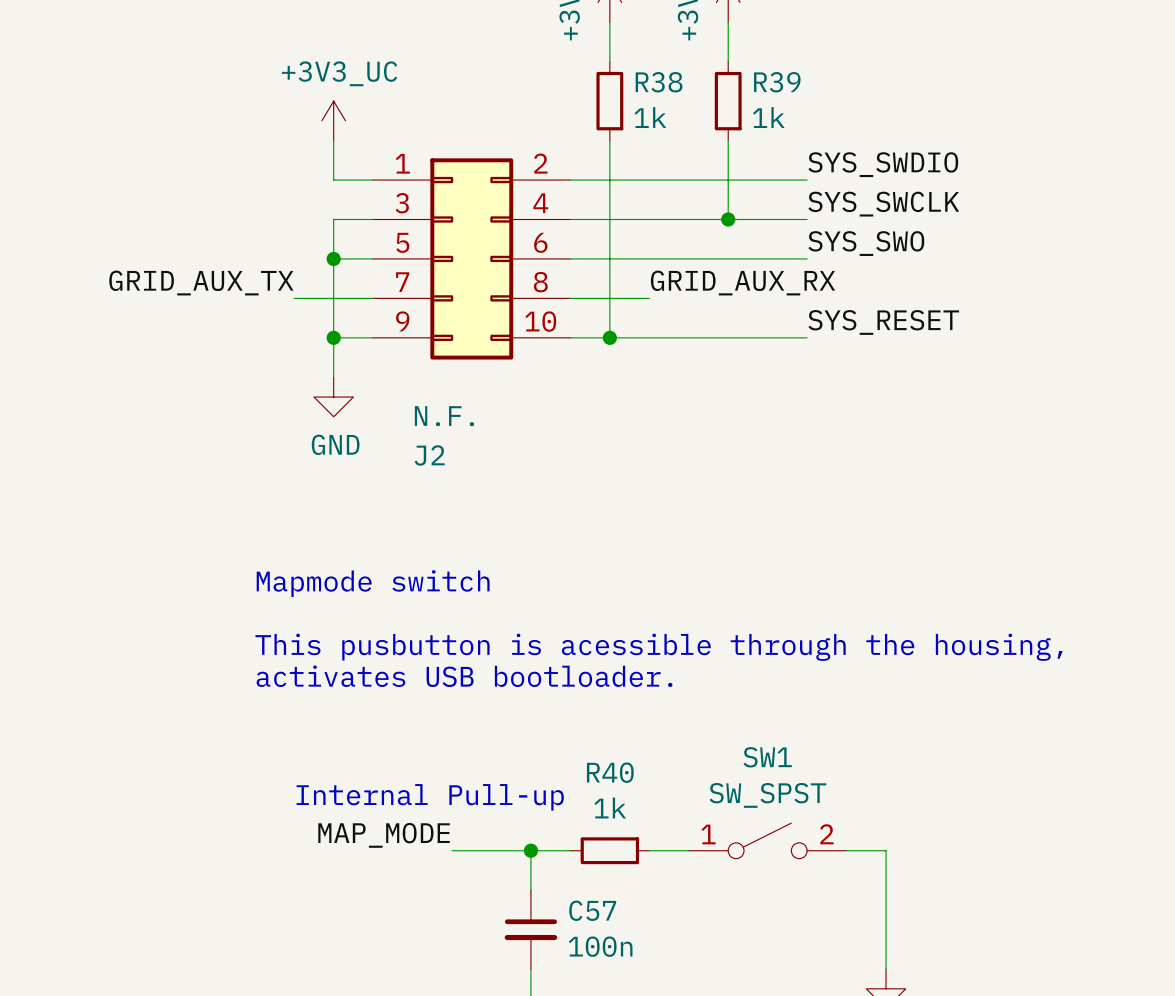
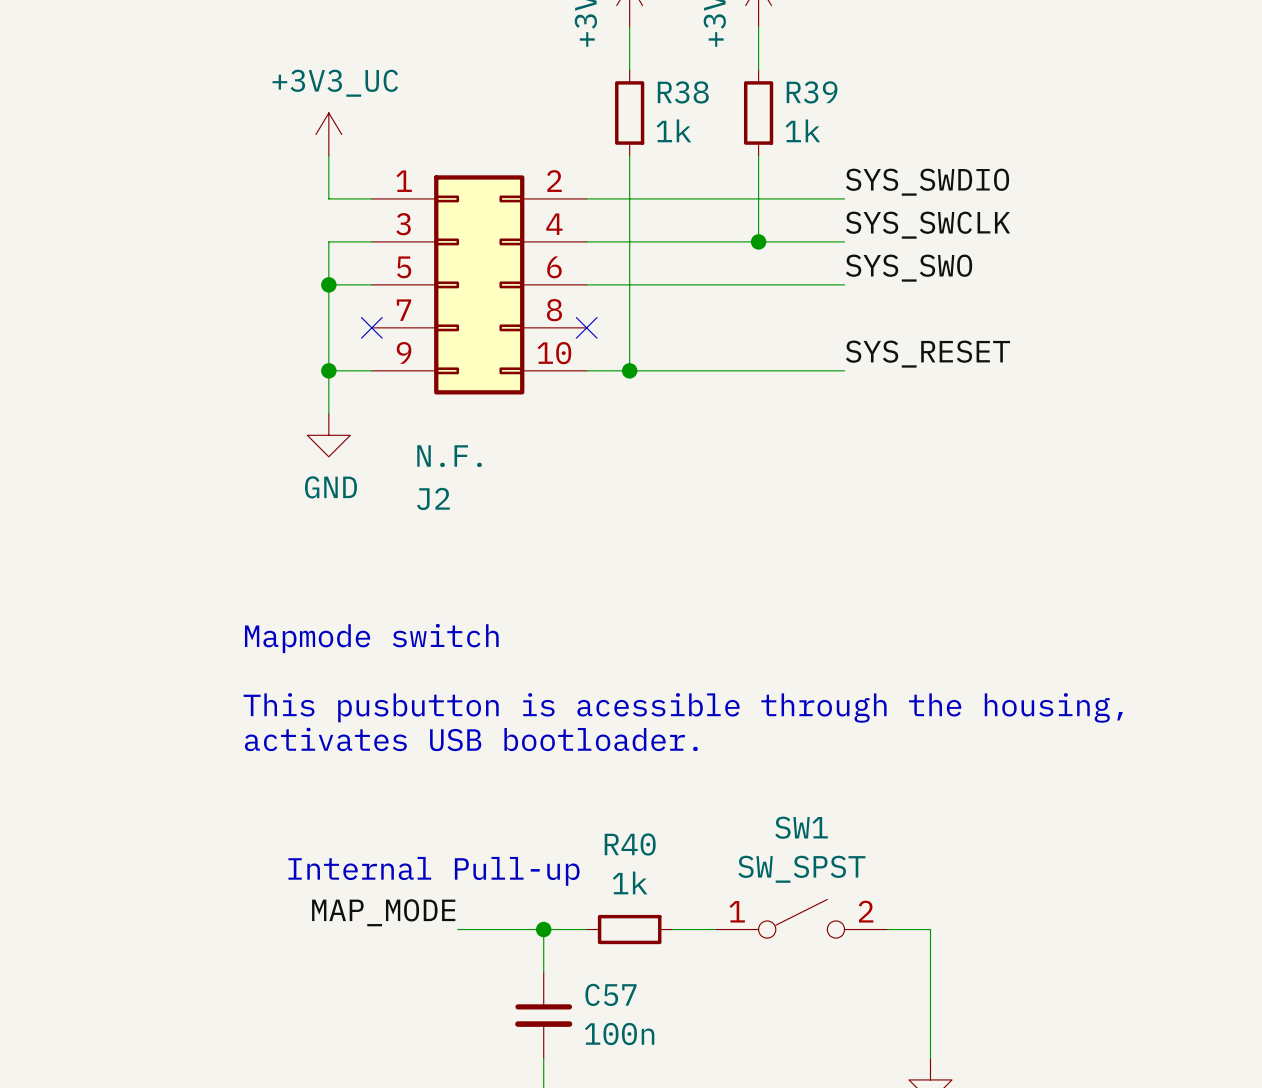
label: GRID_AUX_TX (201, 283) -> none
label: GRID_AUX_RX (743, 283) -> none
wire: (294, 298) (373, 298) -> none
no-connect mark: none -> (371, 327)
wire: (570, 298) (649, 298) -> none
no-connect mark: none -> (586, 327)

